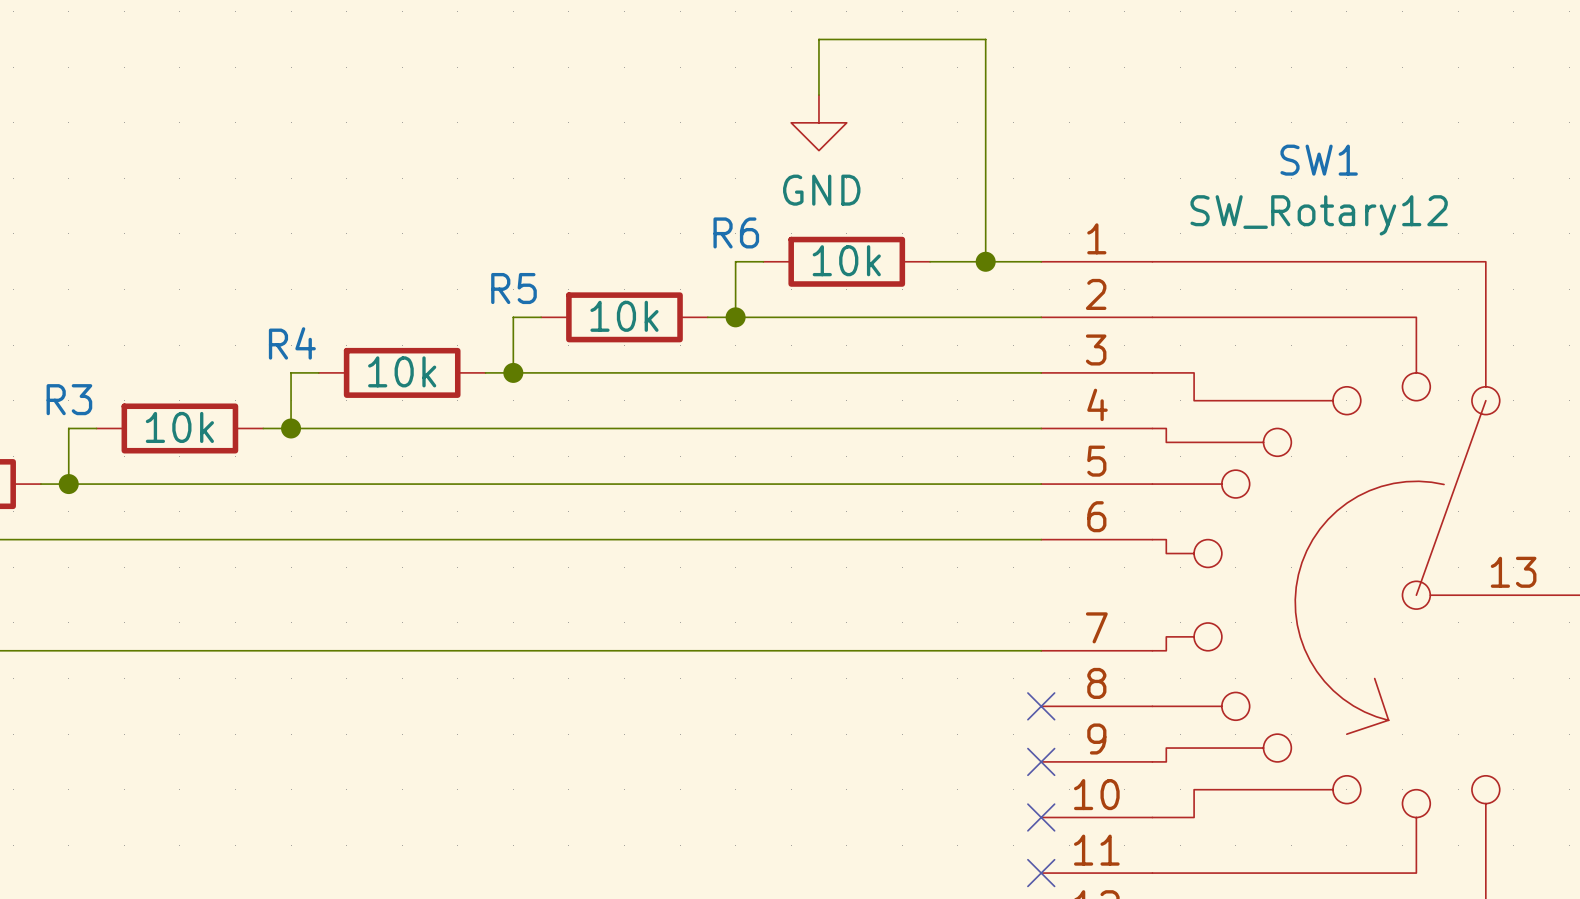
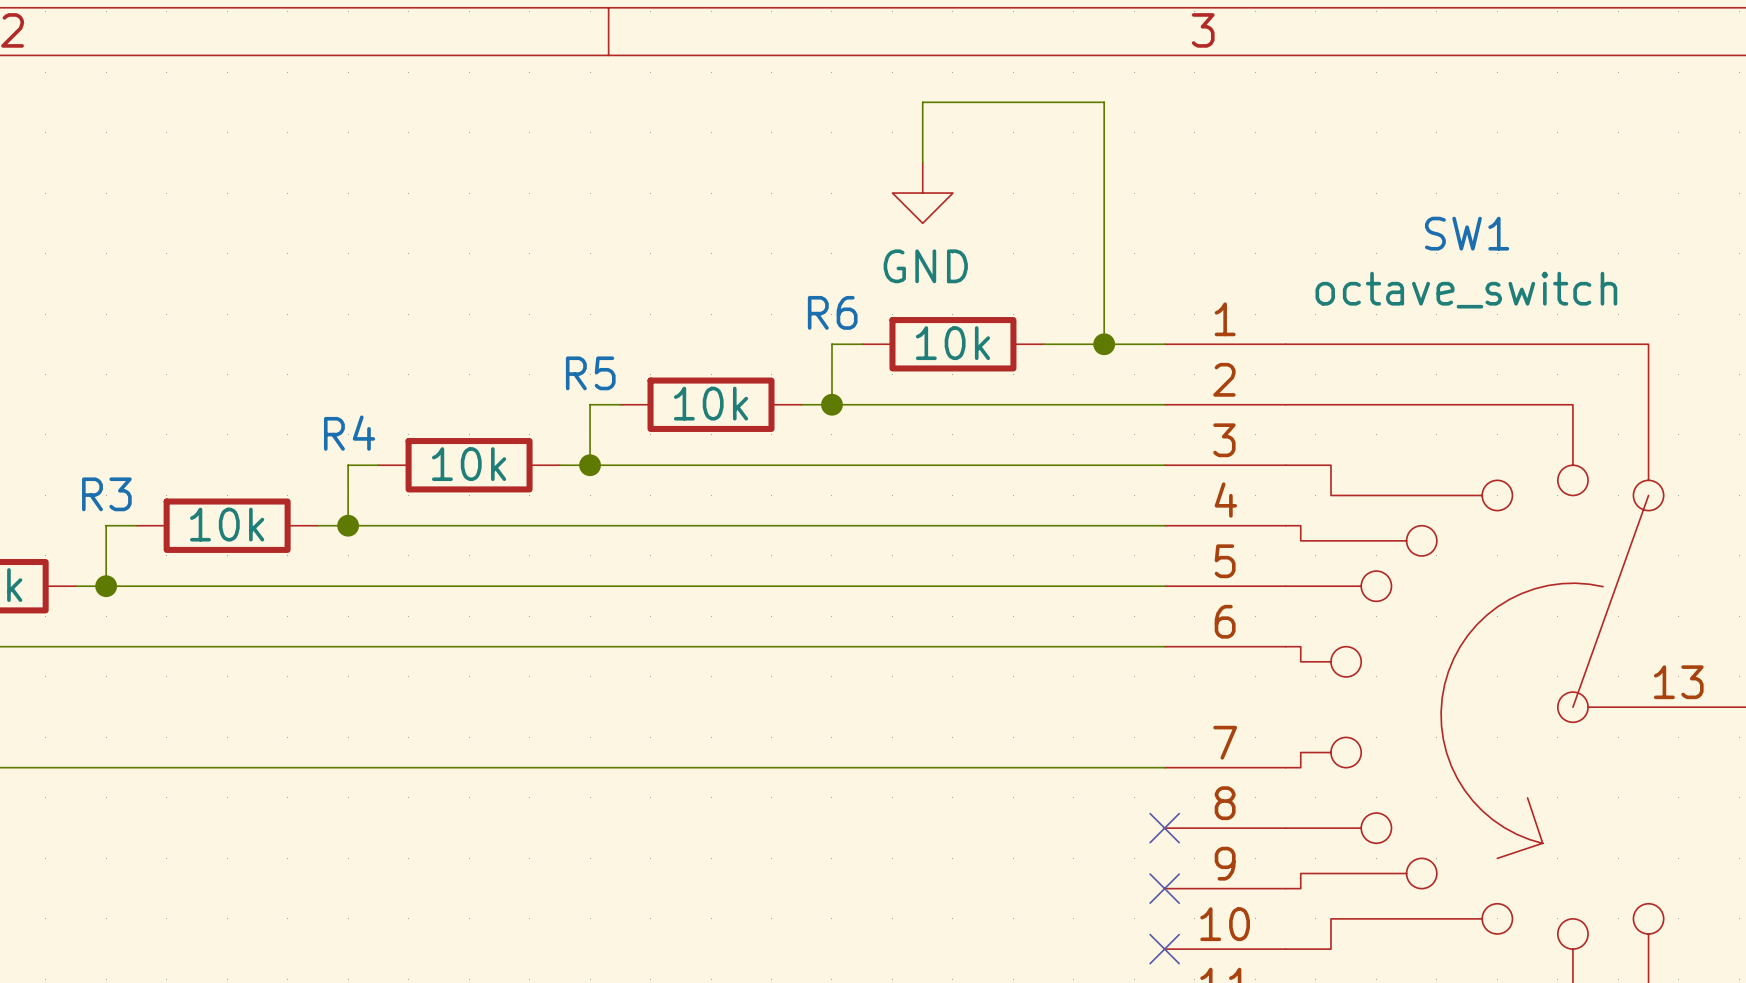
SW1 value: SW_Rotary12 (1319, 215) -> octave_switch (1466, 290)

